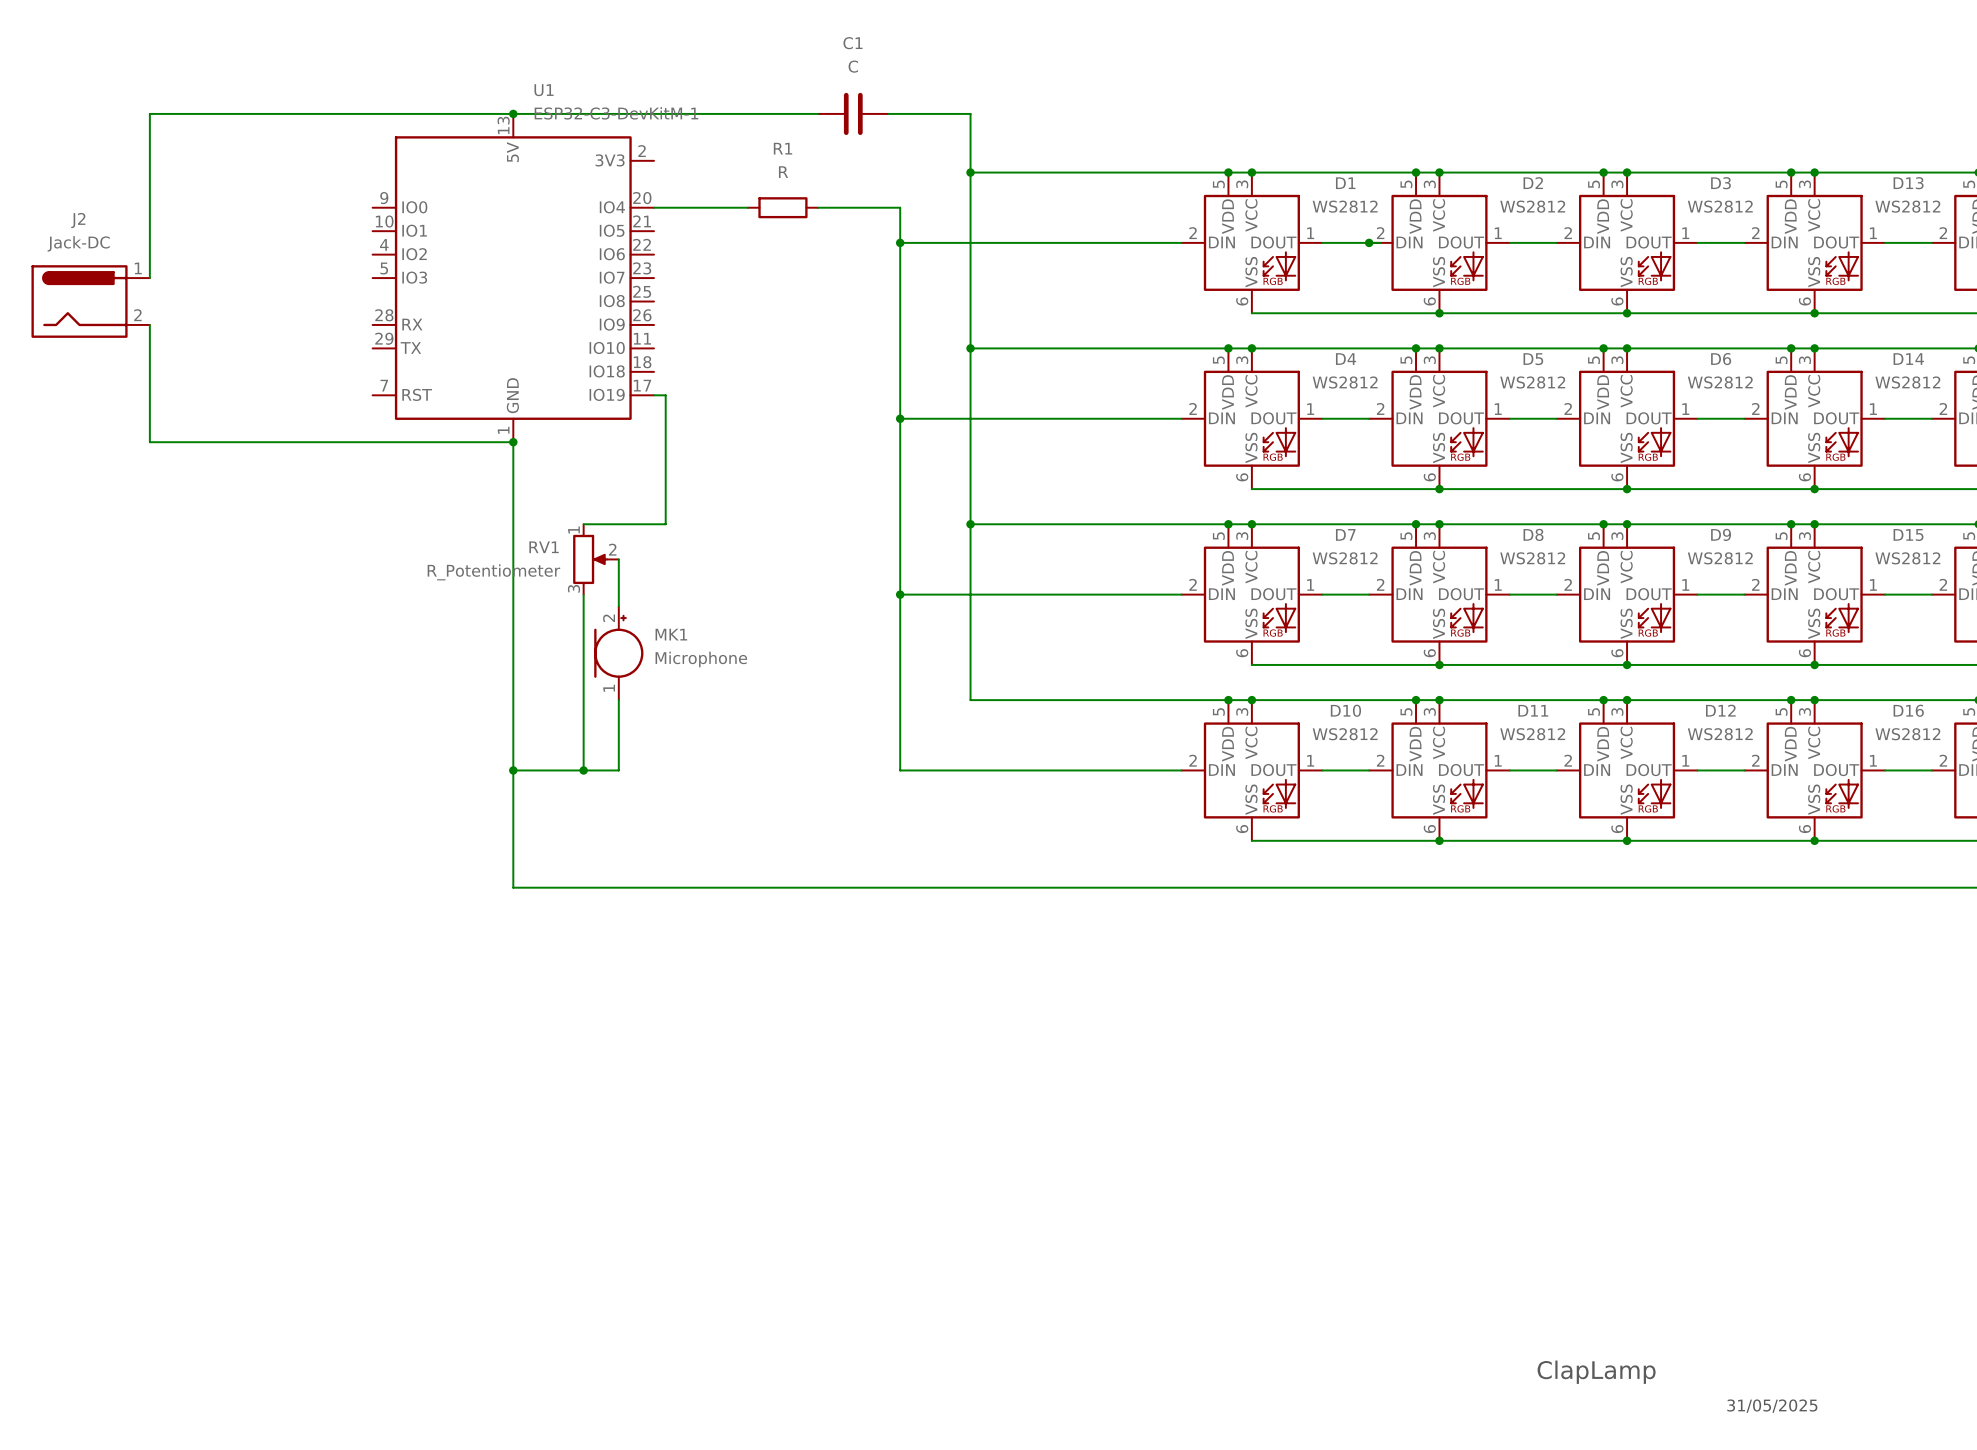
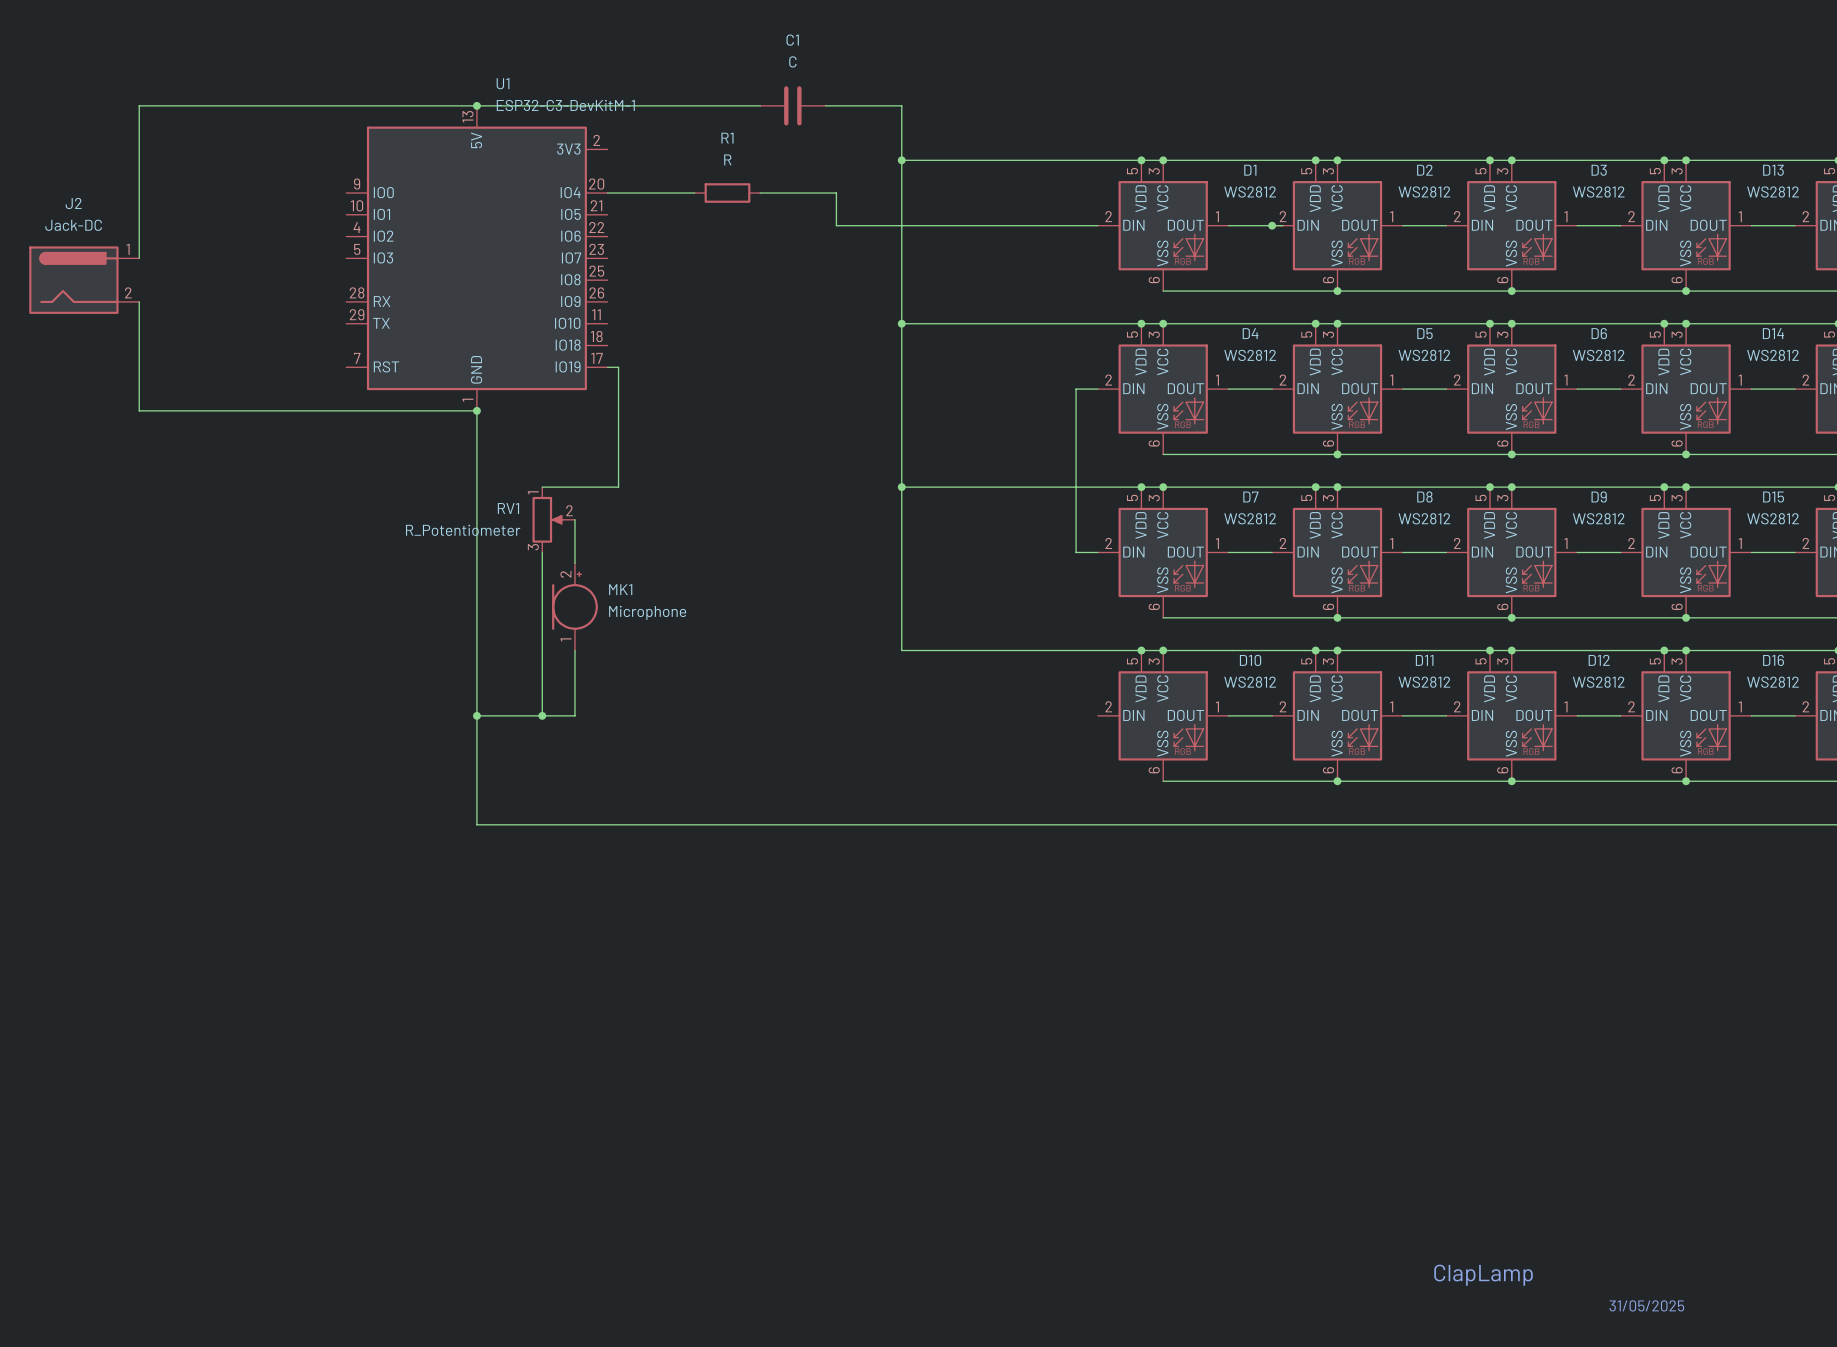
wire: (900, 242) (900, 770) (1181, 770) -> none
junction: (900, 242) -> none
wire: (900, 418) (1158, 418) -> (1076, 552) (1076, 389)
junction: (900, 418) -> none
wire: (900, 594) (1158, 594) -> none
junction: (900, 594) -> none

